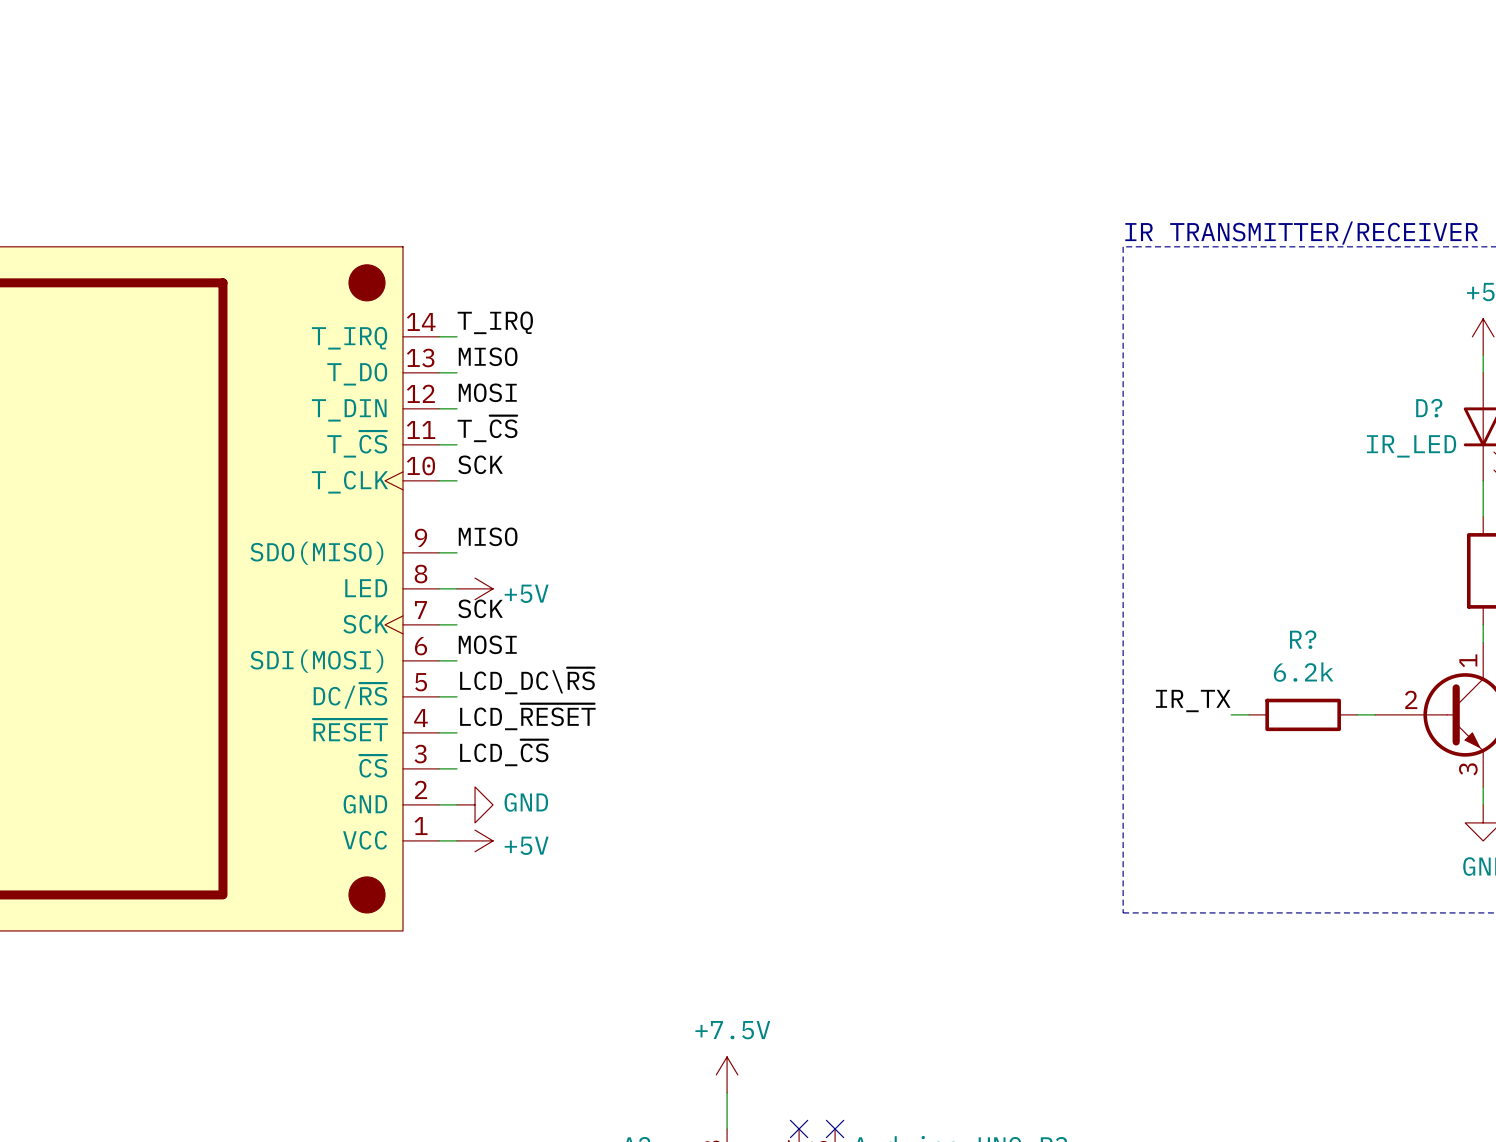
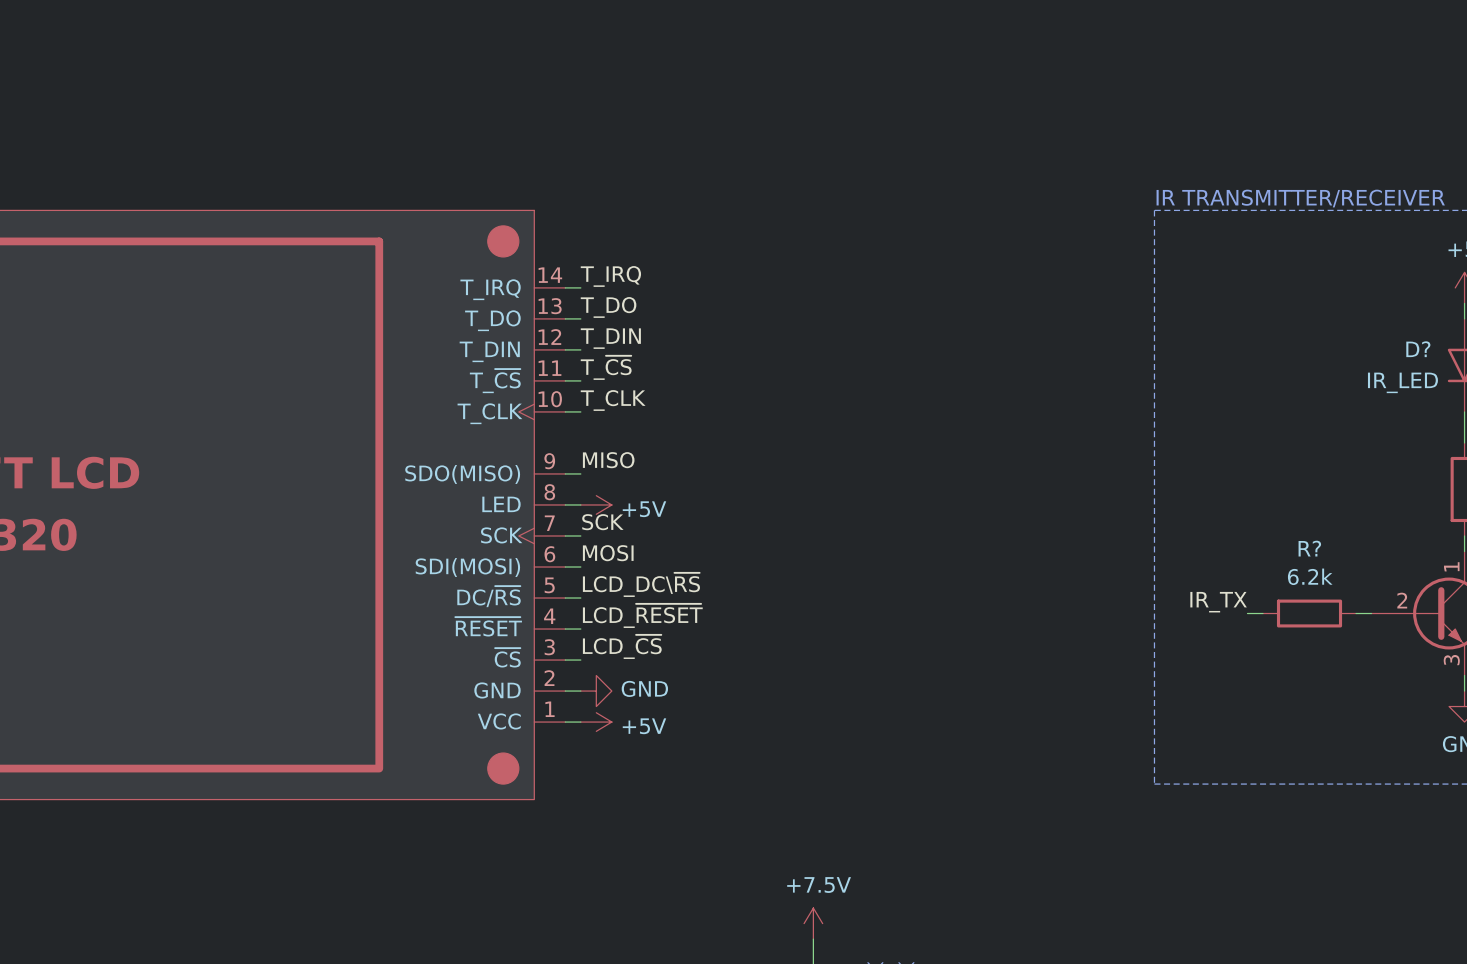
label: MISO (488, 356) -> T_DO (608, 307)
label: MOSI (487, 392) -> T_DIN (610, 338)
label: SCK (480, 464) -> T_CLK (613, 400)

